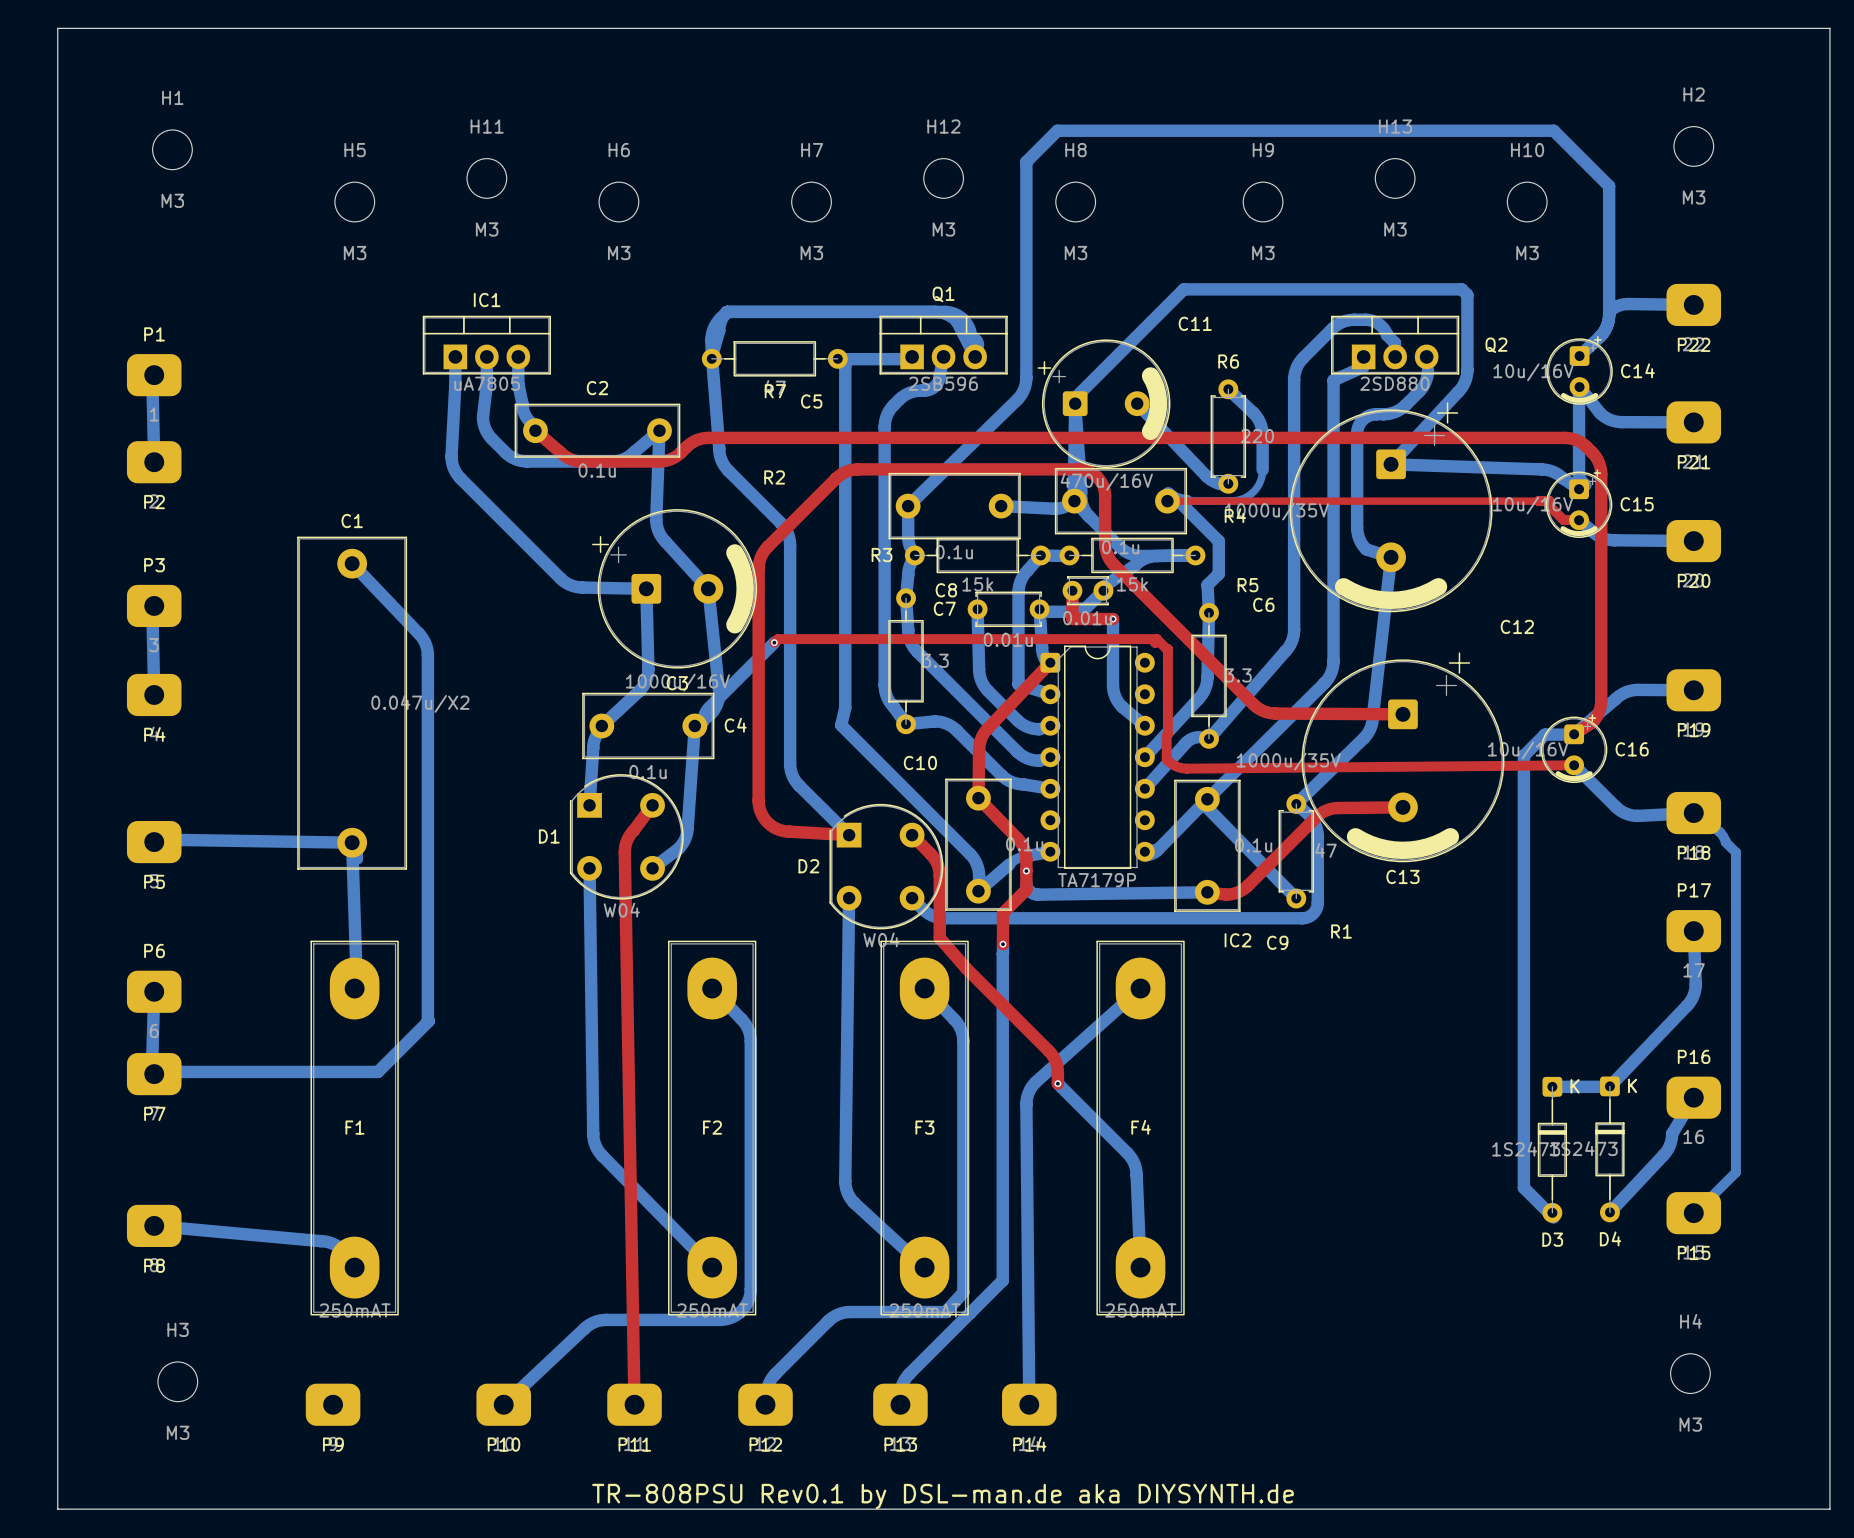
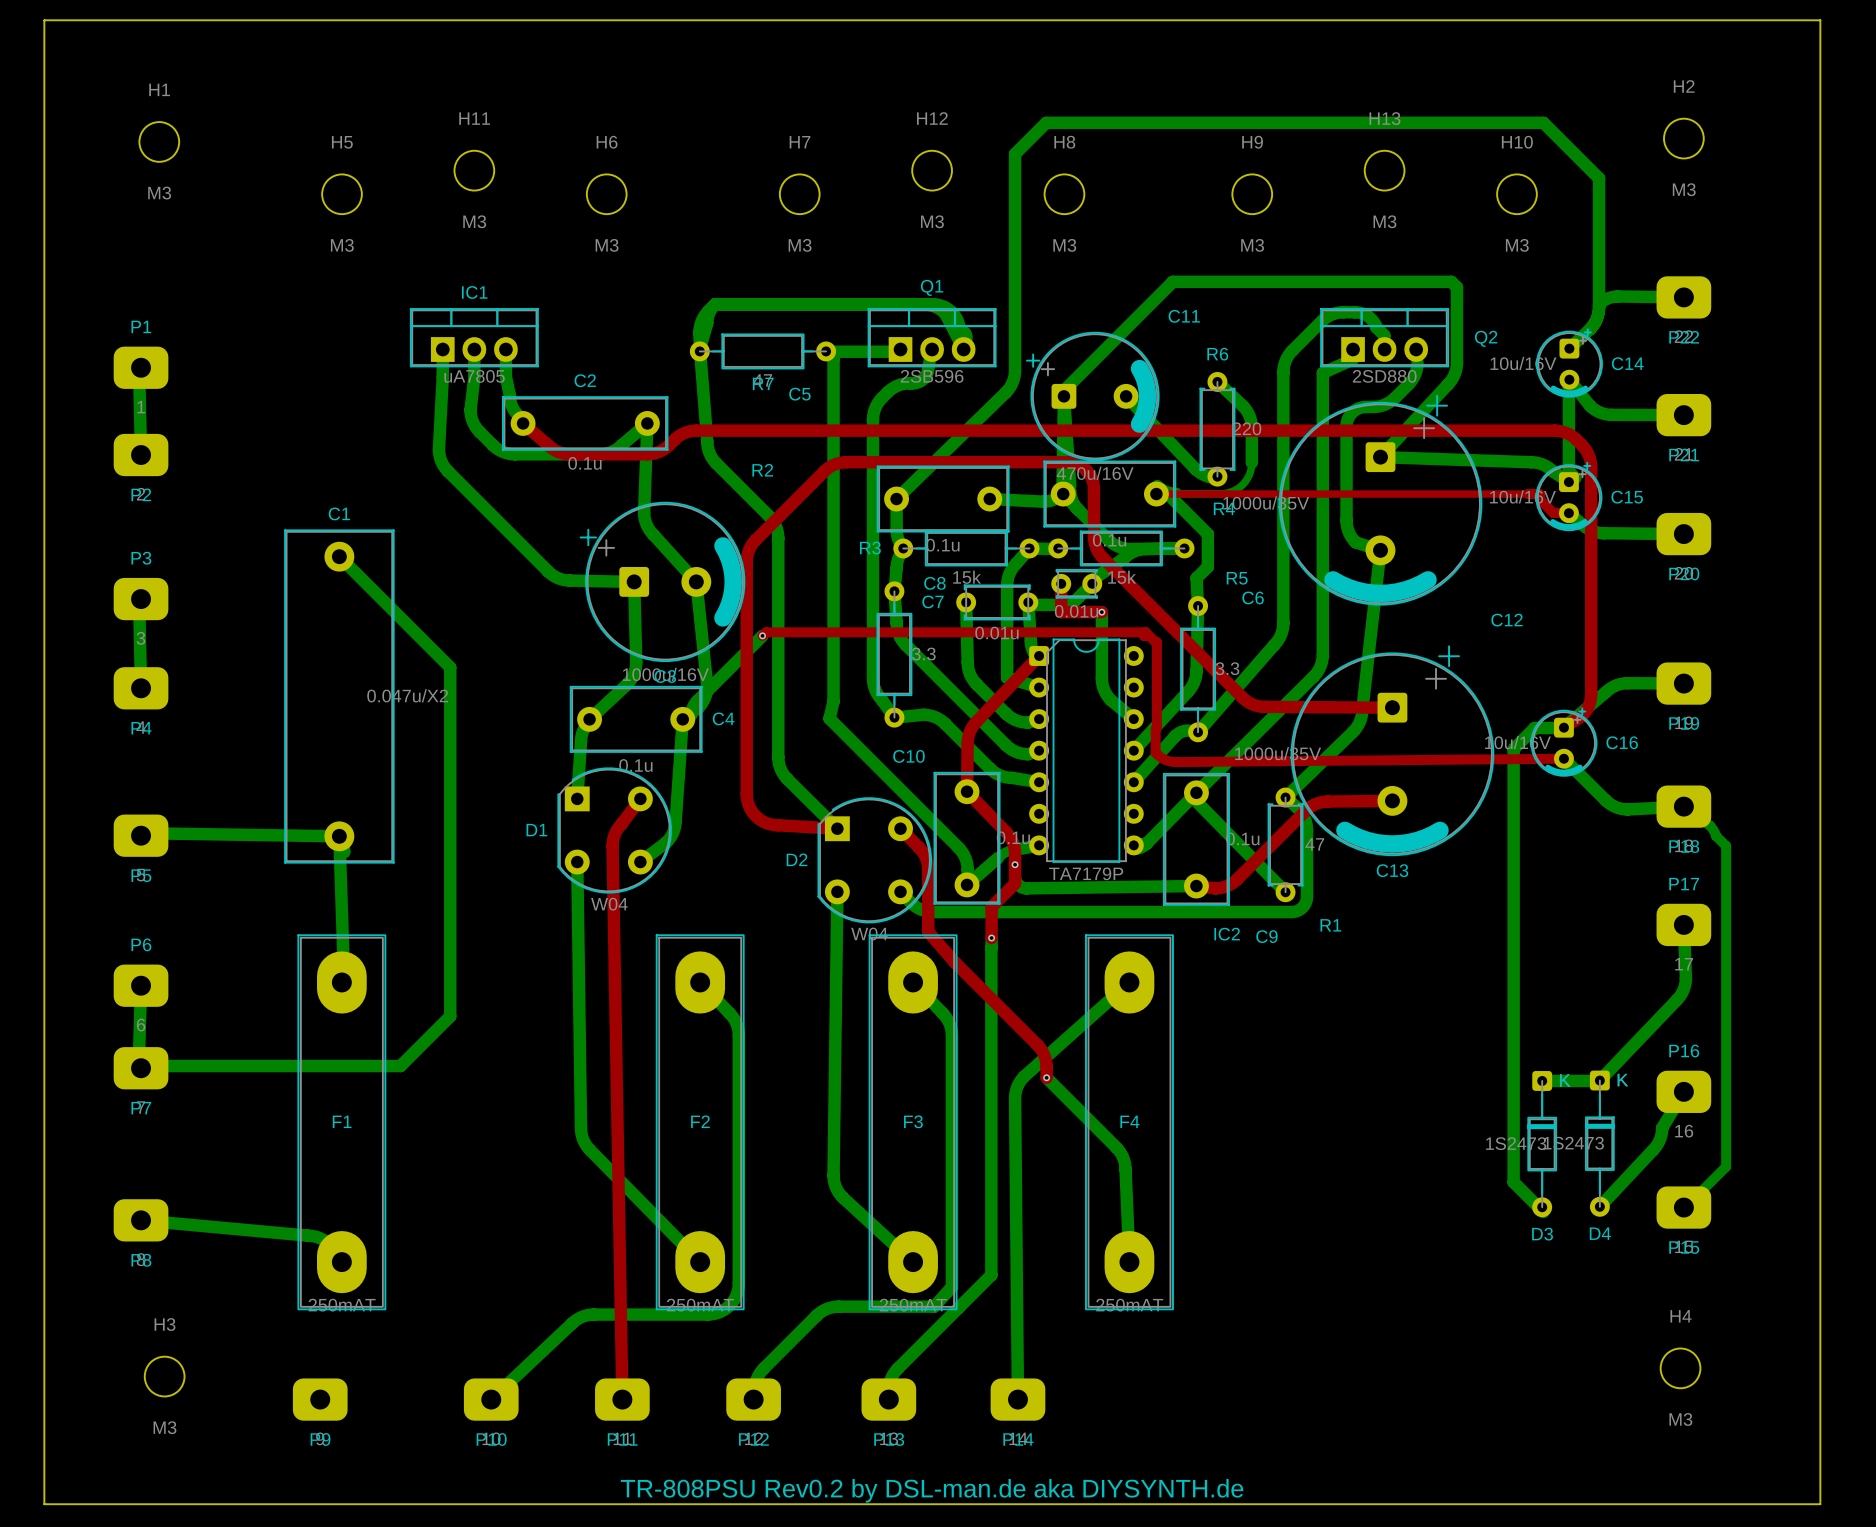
bottom track: (352, 563) (420, 635) (427, 652) (428, 1021) (377, 1071) -> (339, 556) (450, 667) (450, 1016) (400, 1066) (365, 1066)
text: TR-808PSU Rev0.1 by DSL-man.de aka DIYSYNTH.de (943, 1496) -> TR-808PSU Rev0.2 by DSL-man.de aka DIYSYNTH.de (932, 1490)

